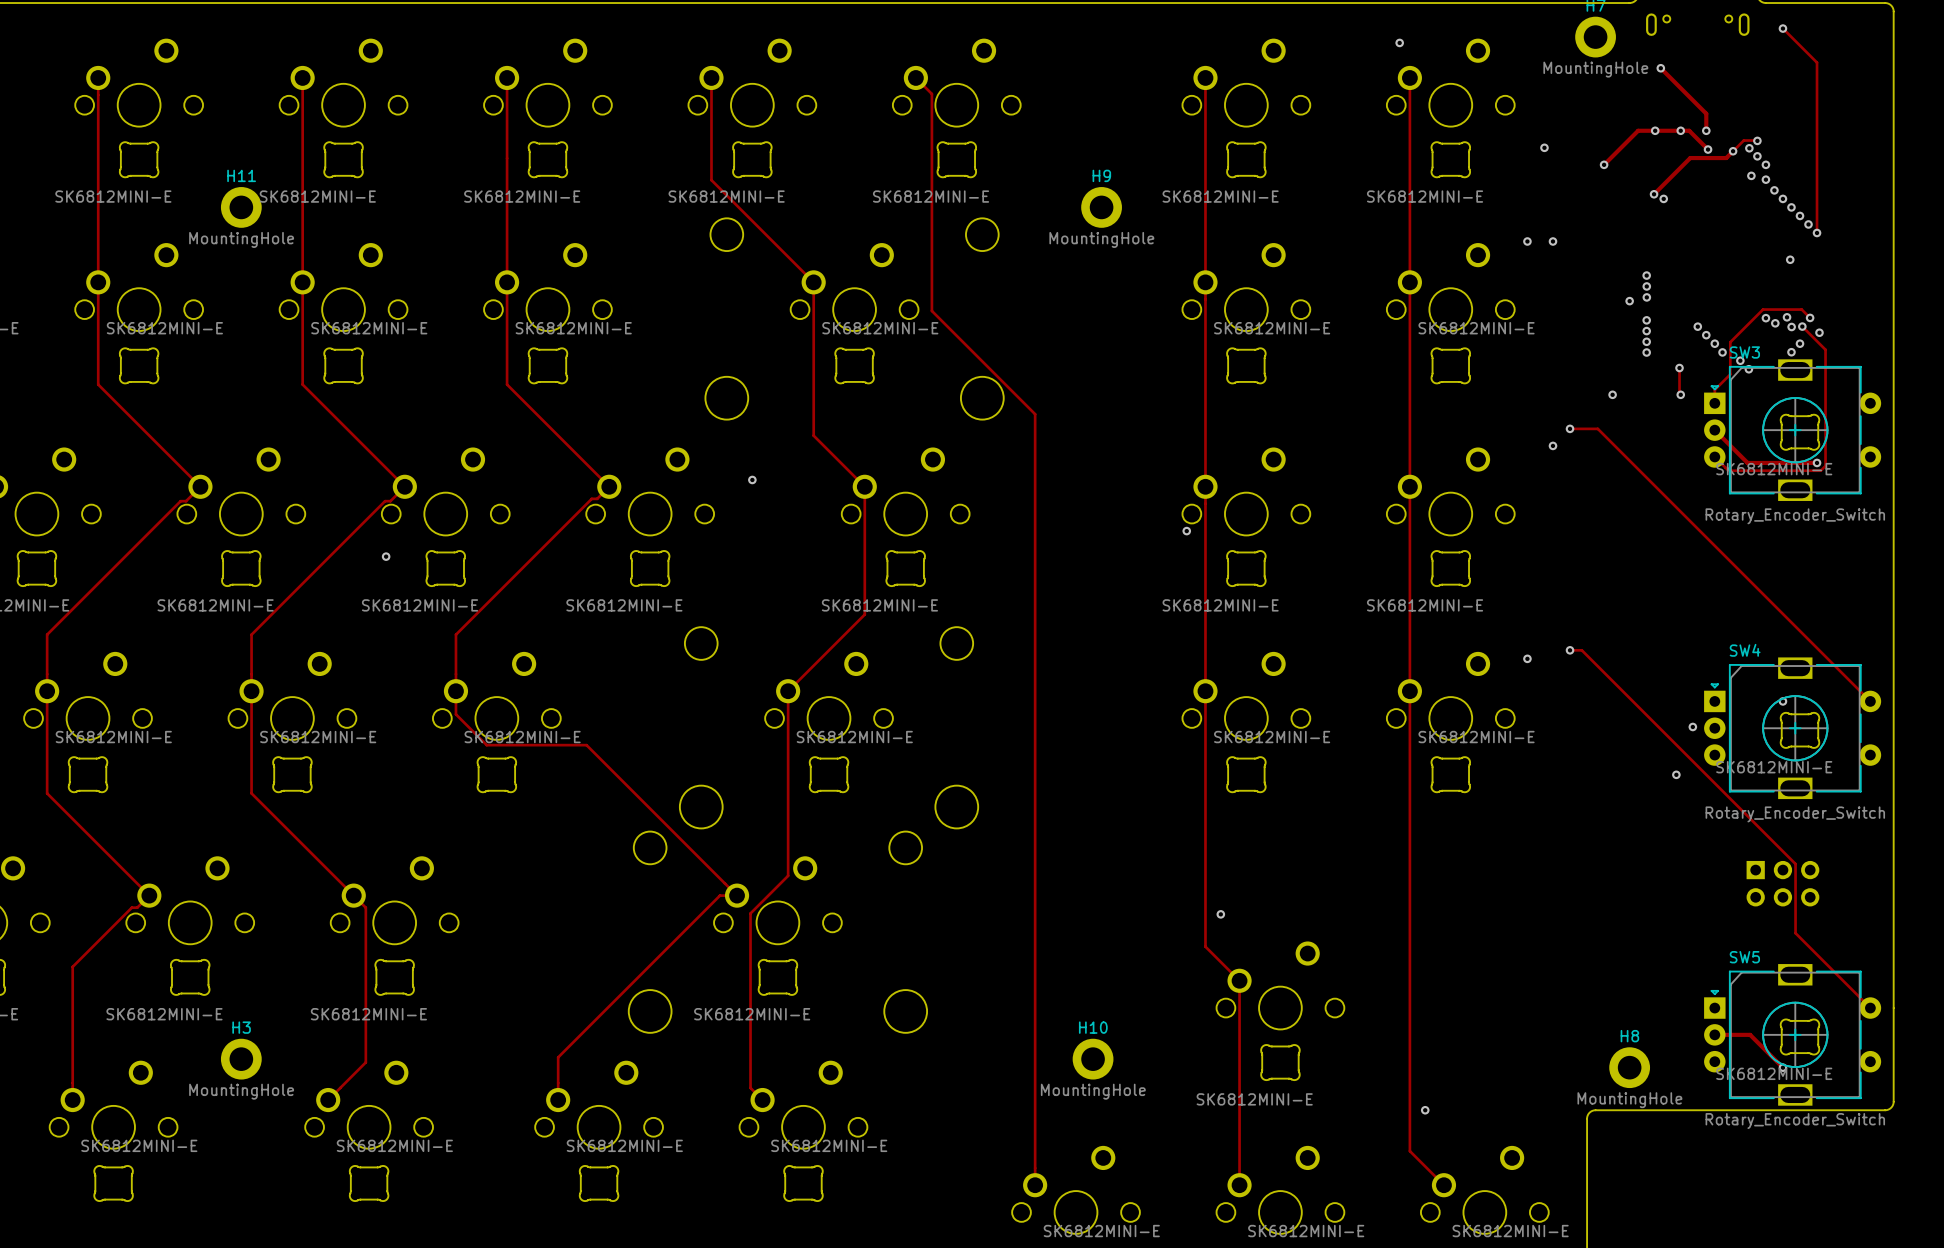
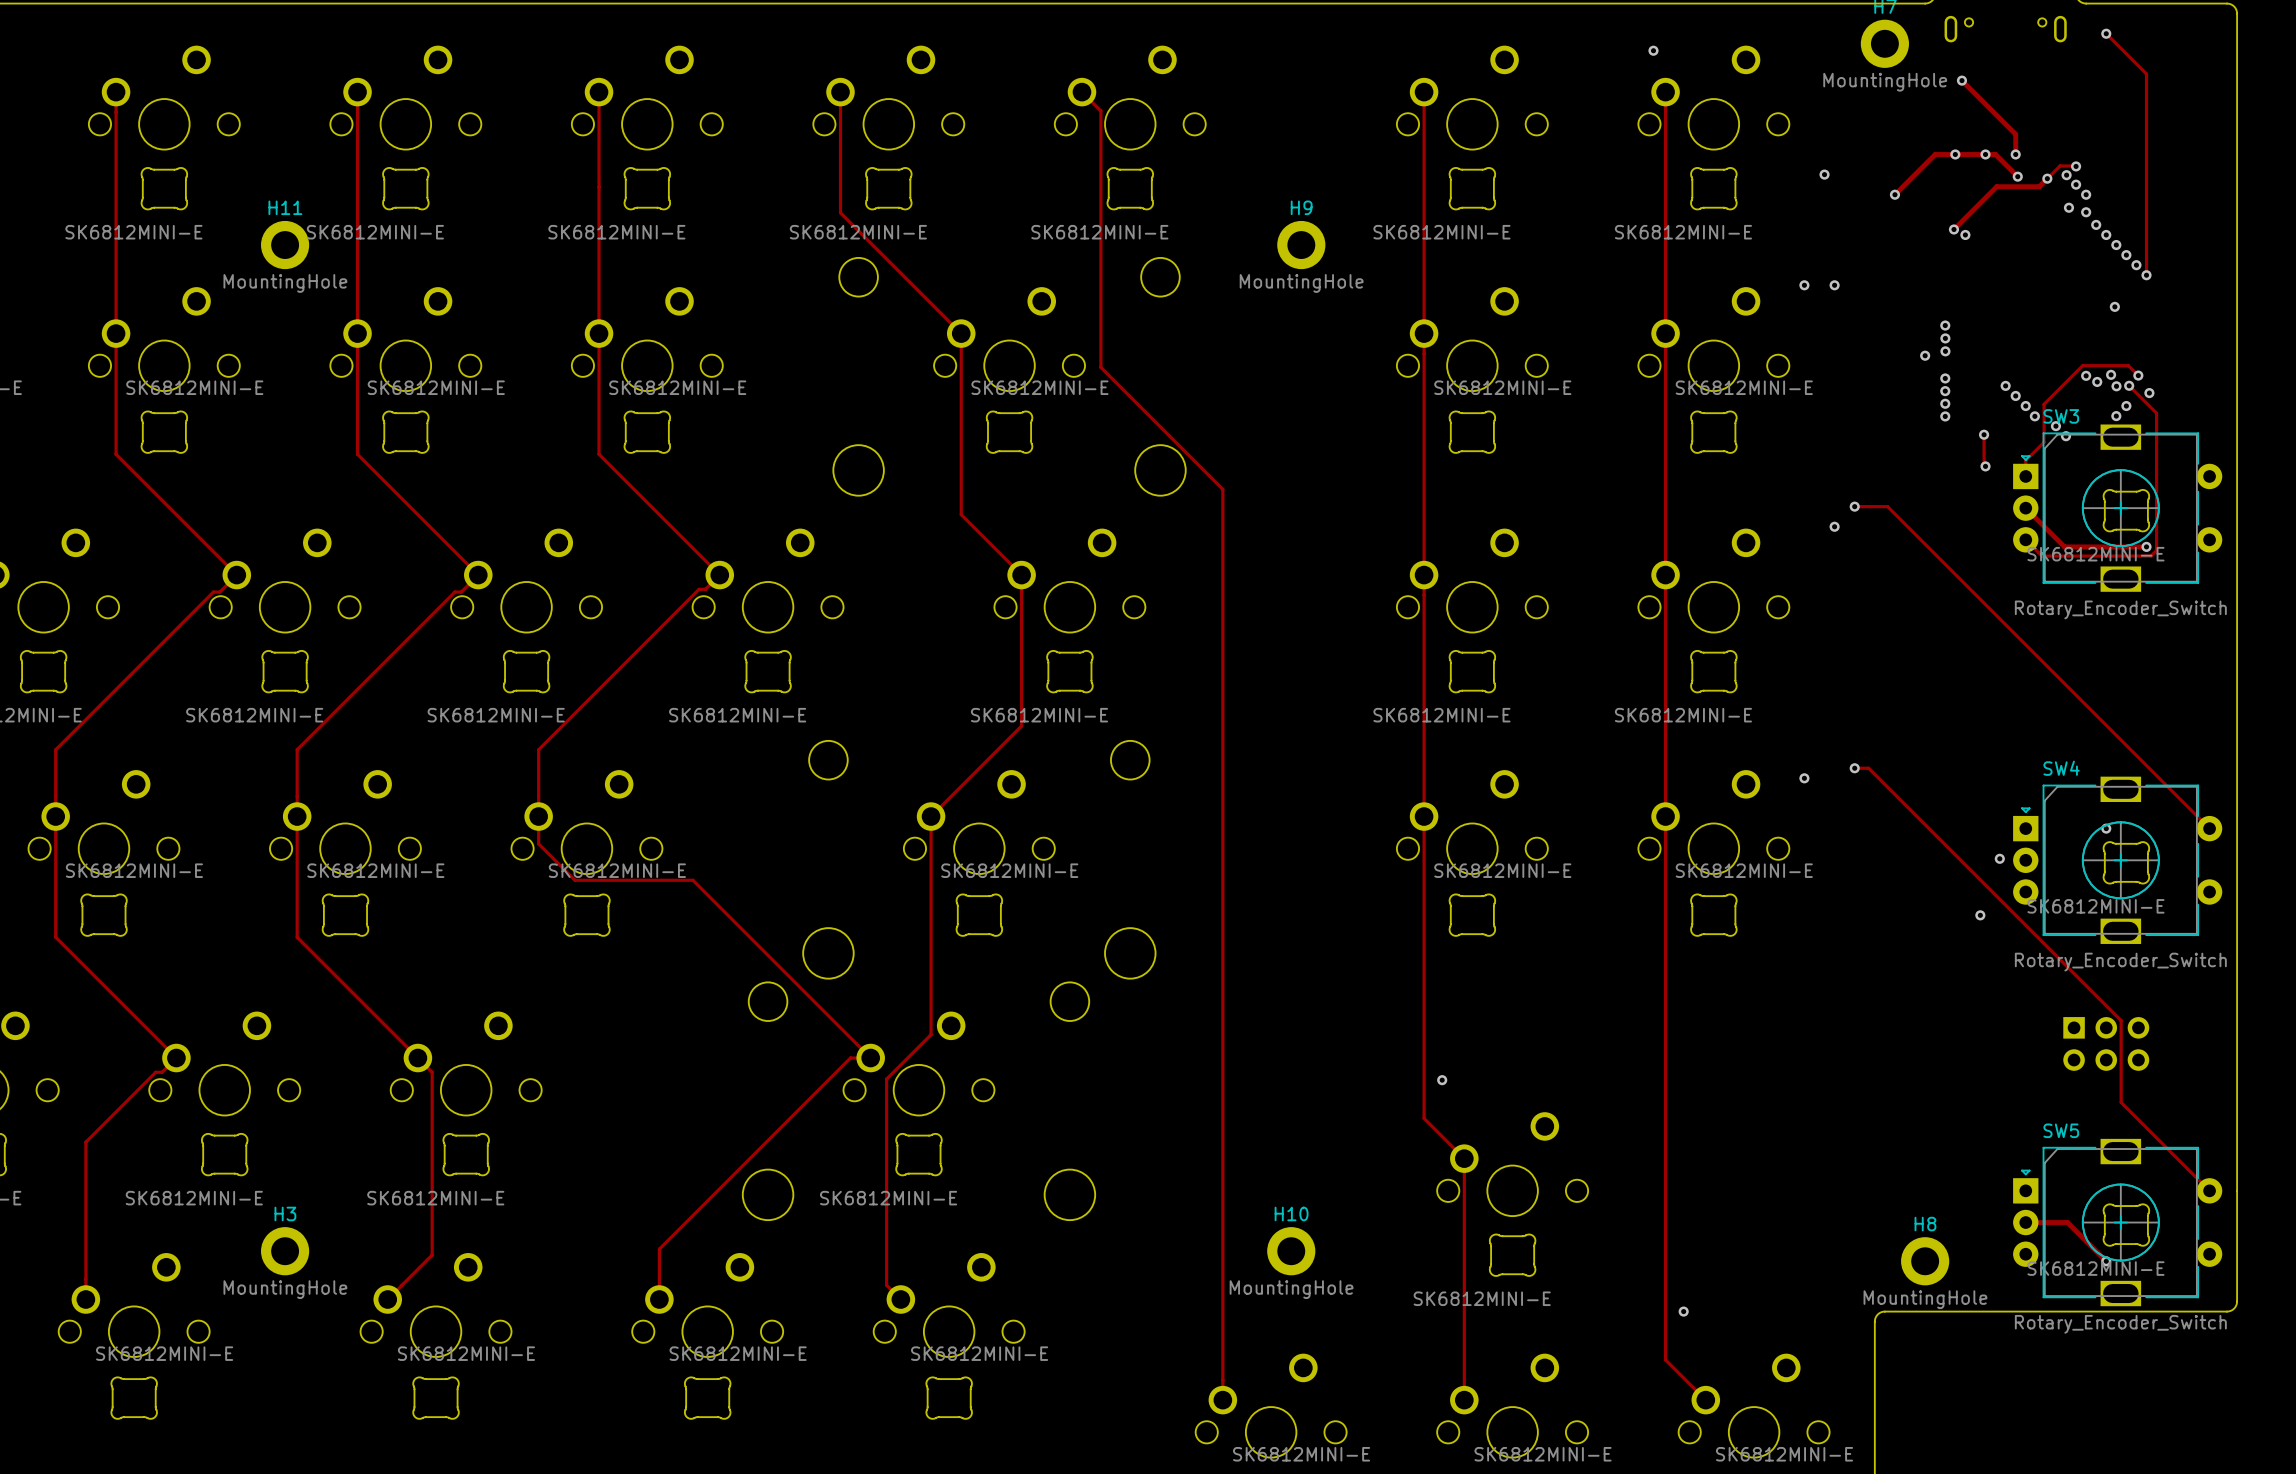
via: (1612, 394) -> none
via: (752, 479) -> none
via: (1186, 531) -> none
via: (386, 556) -> none

